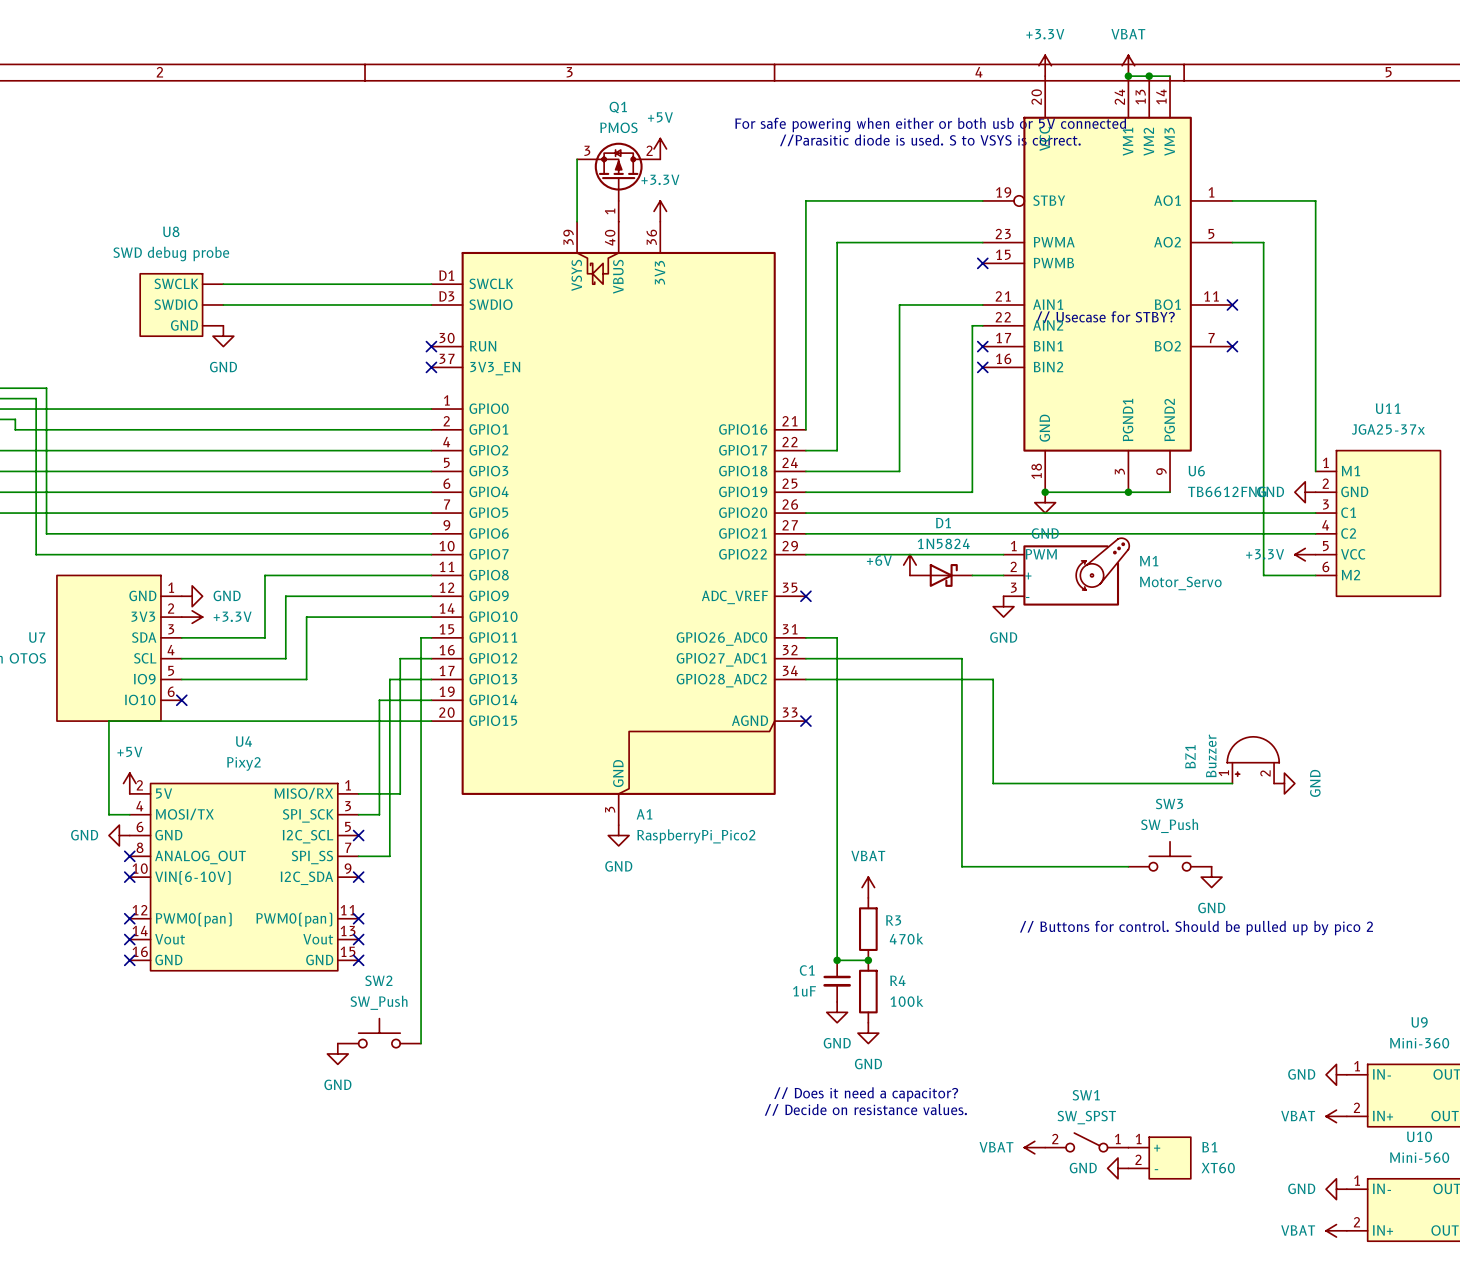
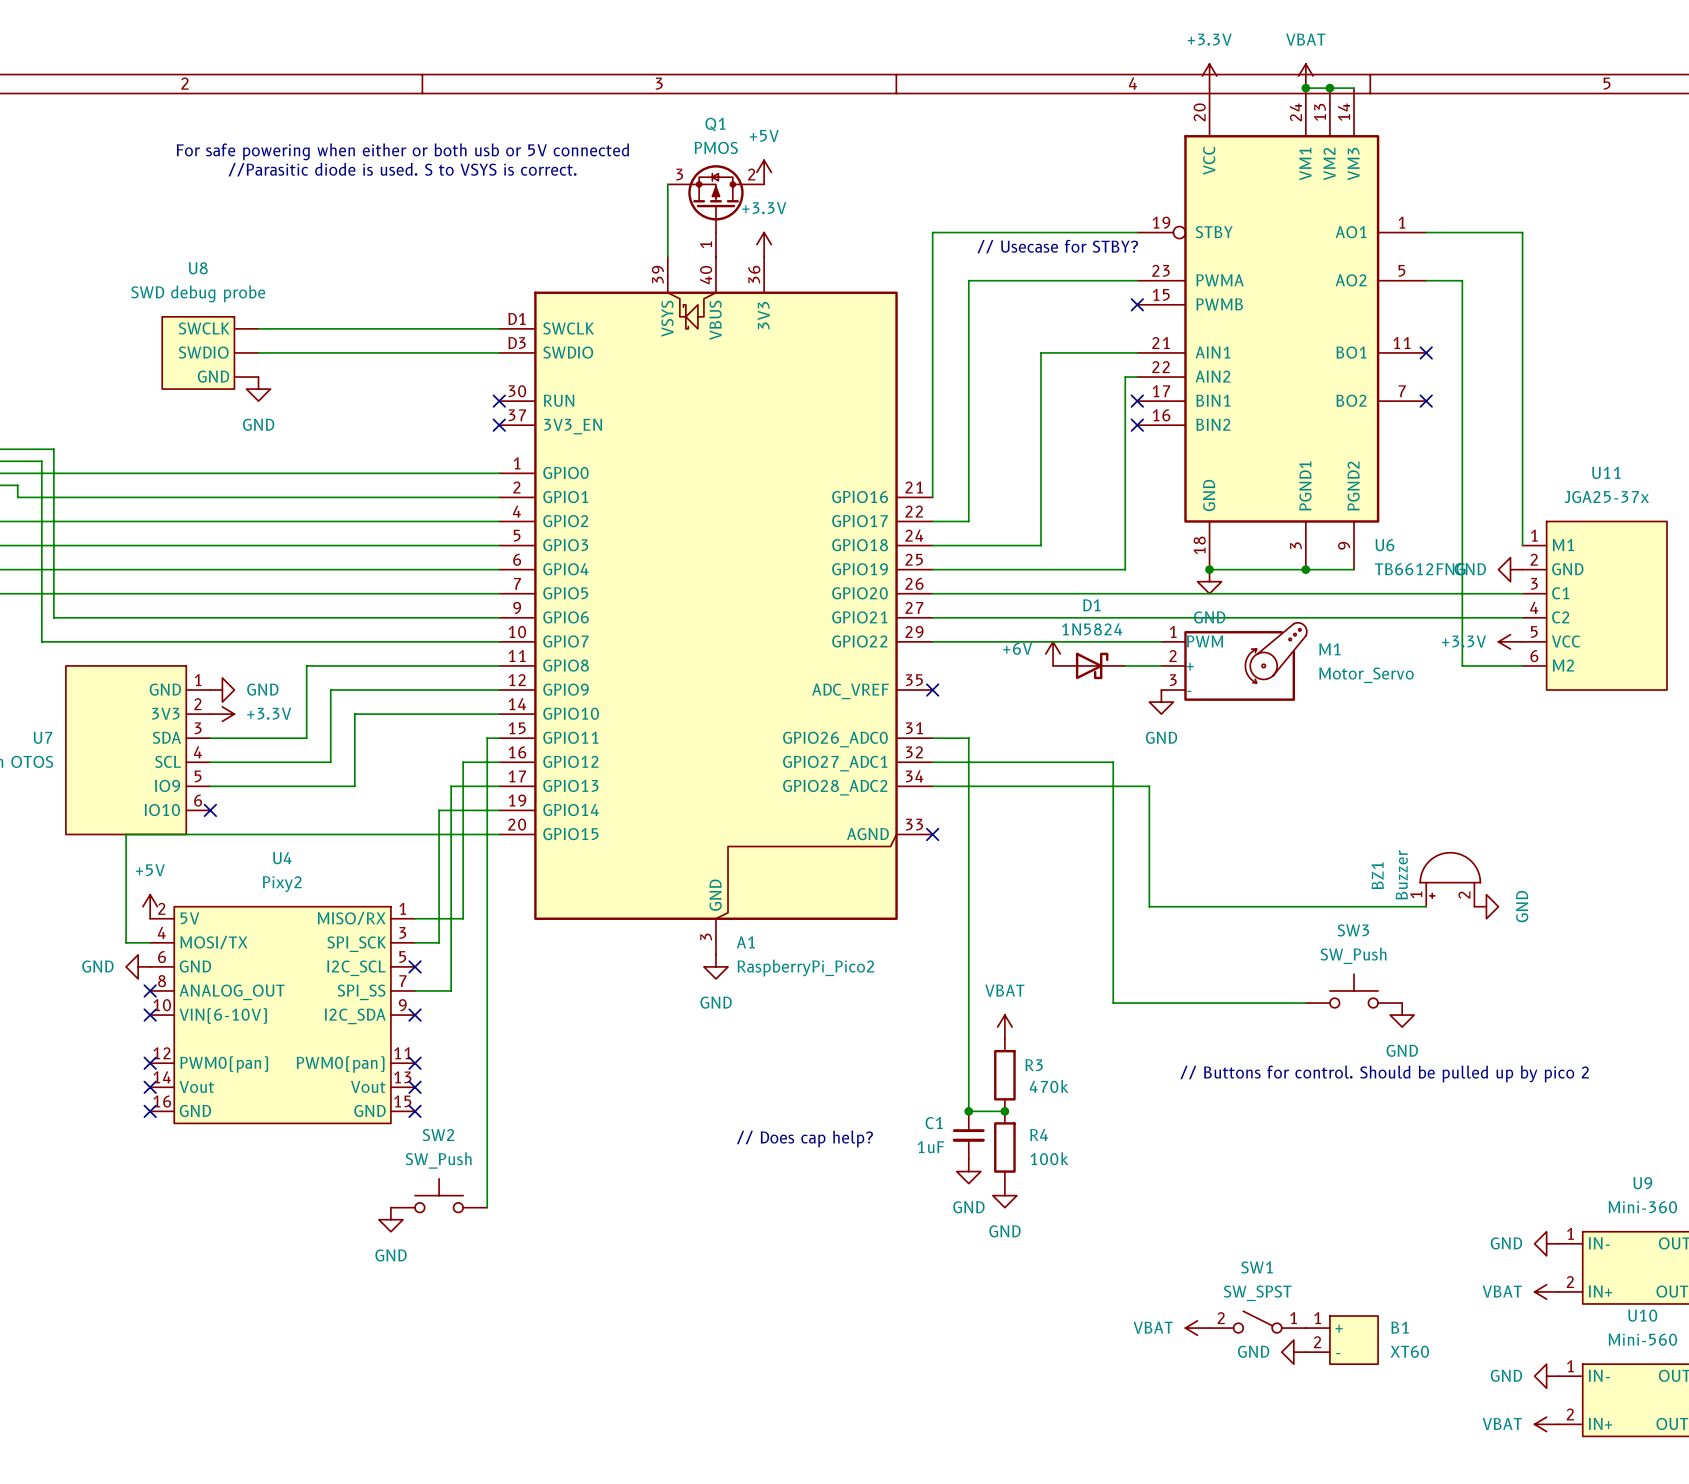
text: For safe powering when either or both usb or 5V connected (930, 125) -> none
text: none -> For safe powering when either or both usb or 5V connected (402, 151)
text: //Parasitic diode is used. S to VSYS is correct. (930, 140) -> none
text: none -> //Parasitic diode is used. S to VSYS is correct. (402, 169)
text: none -> // Usecase for STBY? (1057, 246)
text: // Usecase for STBY? (1105, 317) -> none
text: none -> // Does cap help? (804, 1139)
text: // Does it need a capacitor? (866, 1094) -> none
text: // Decide on resistance values. (865, 1109) -> none

